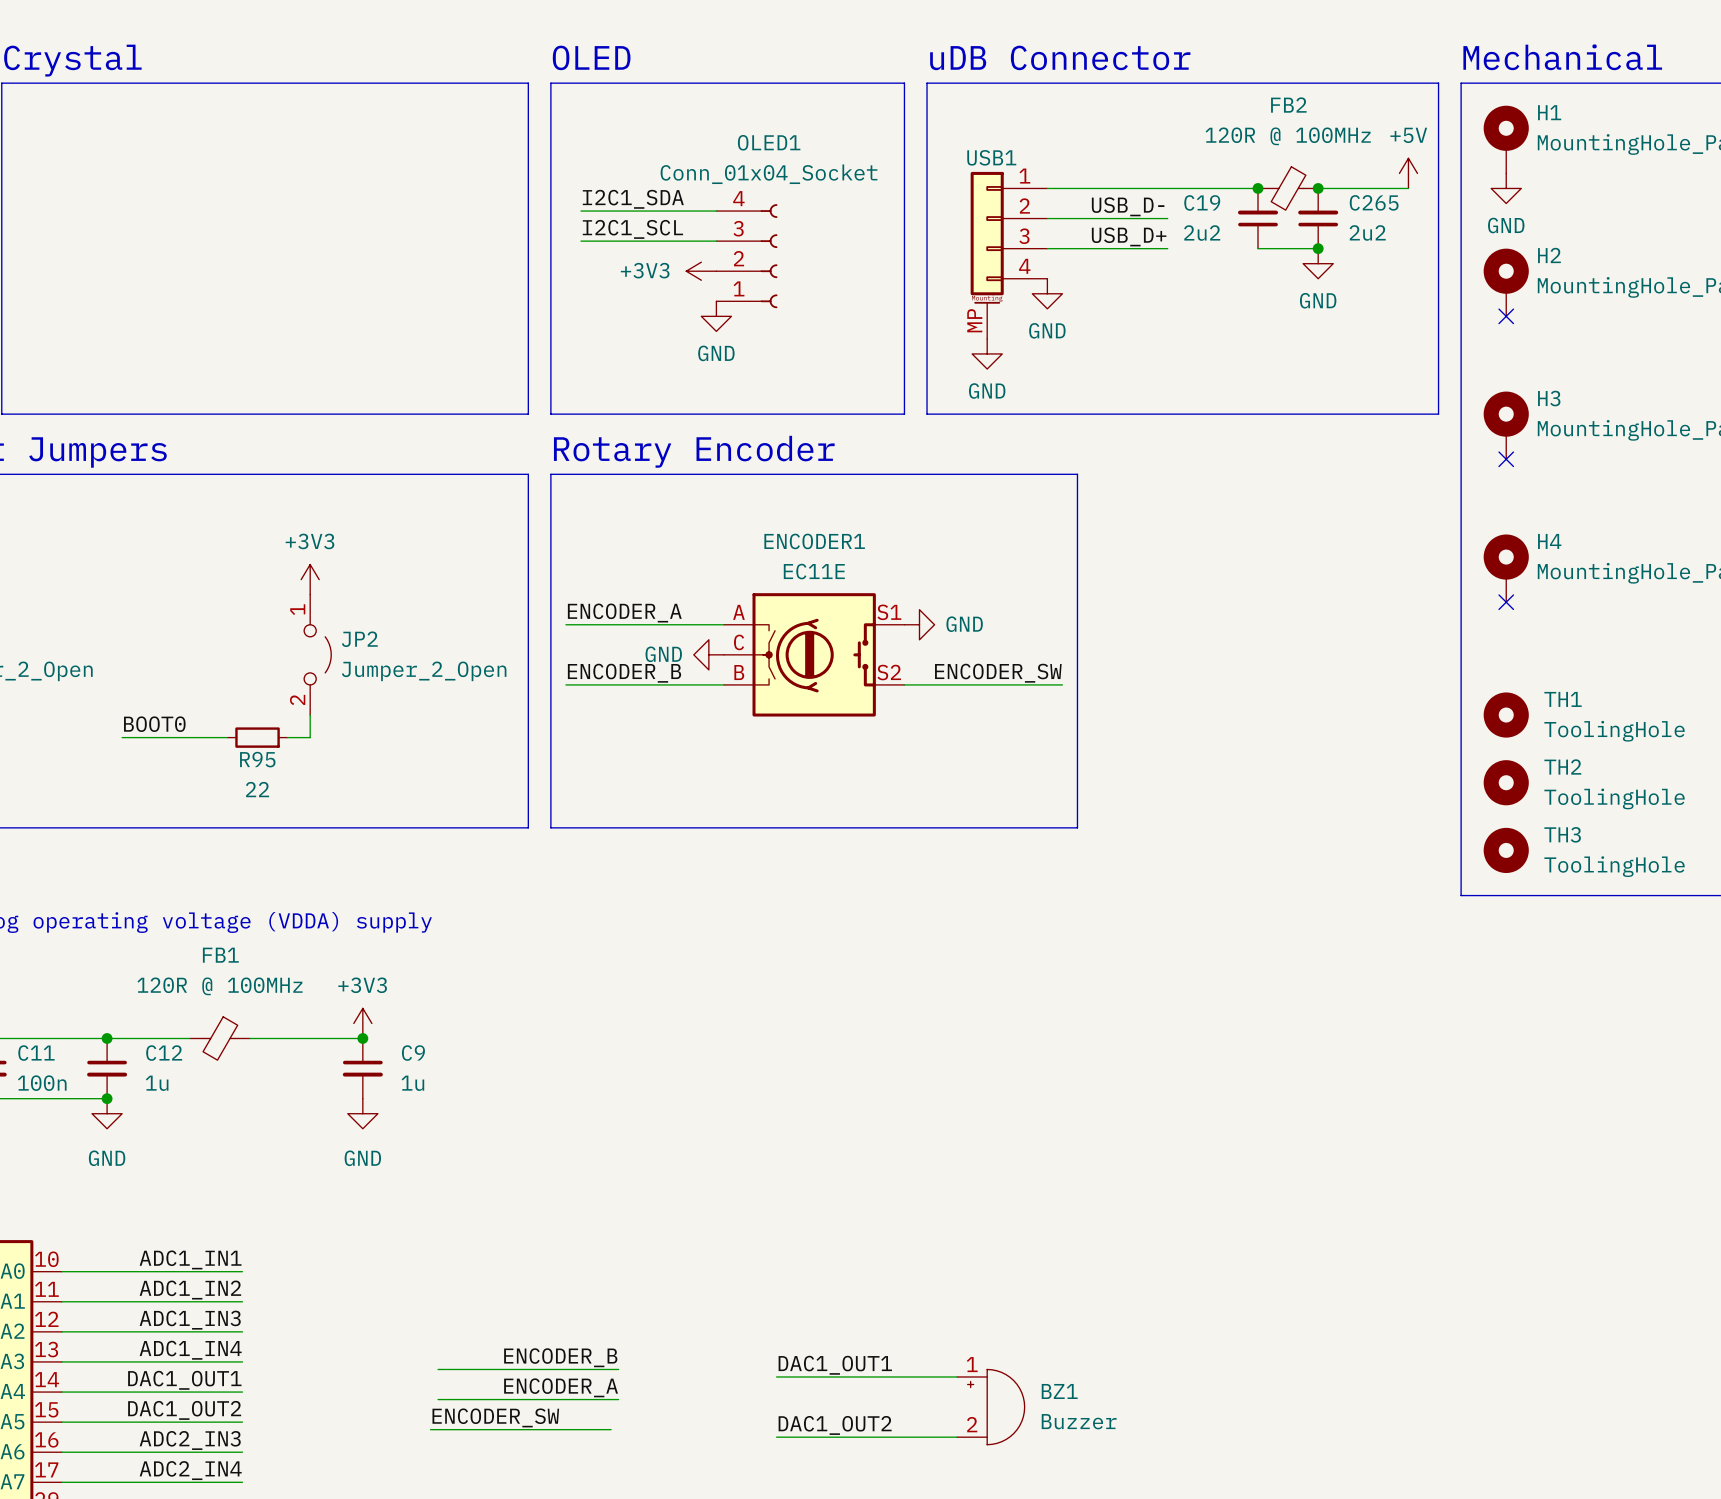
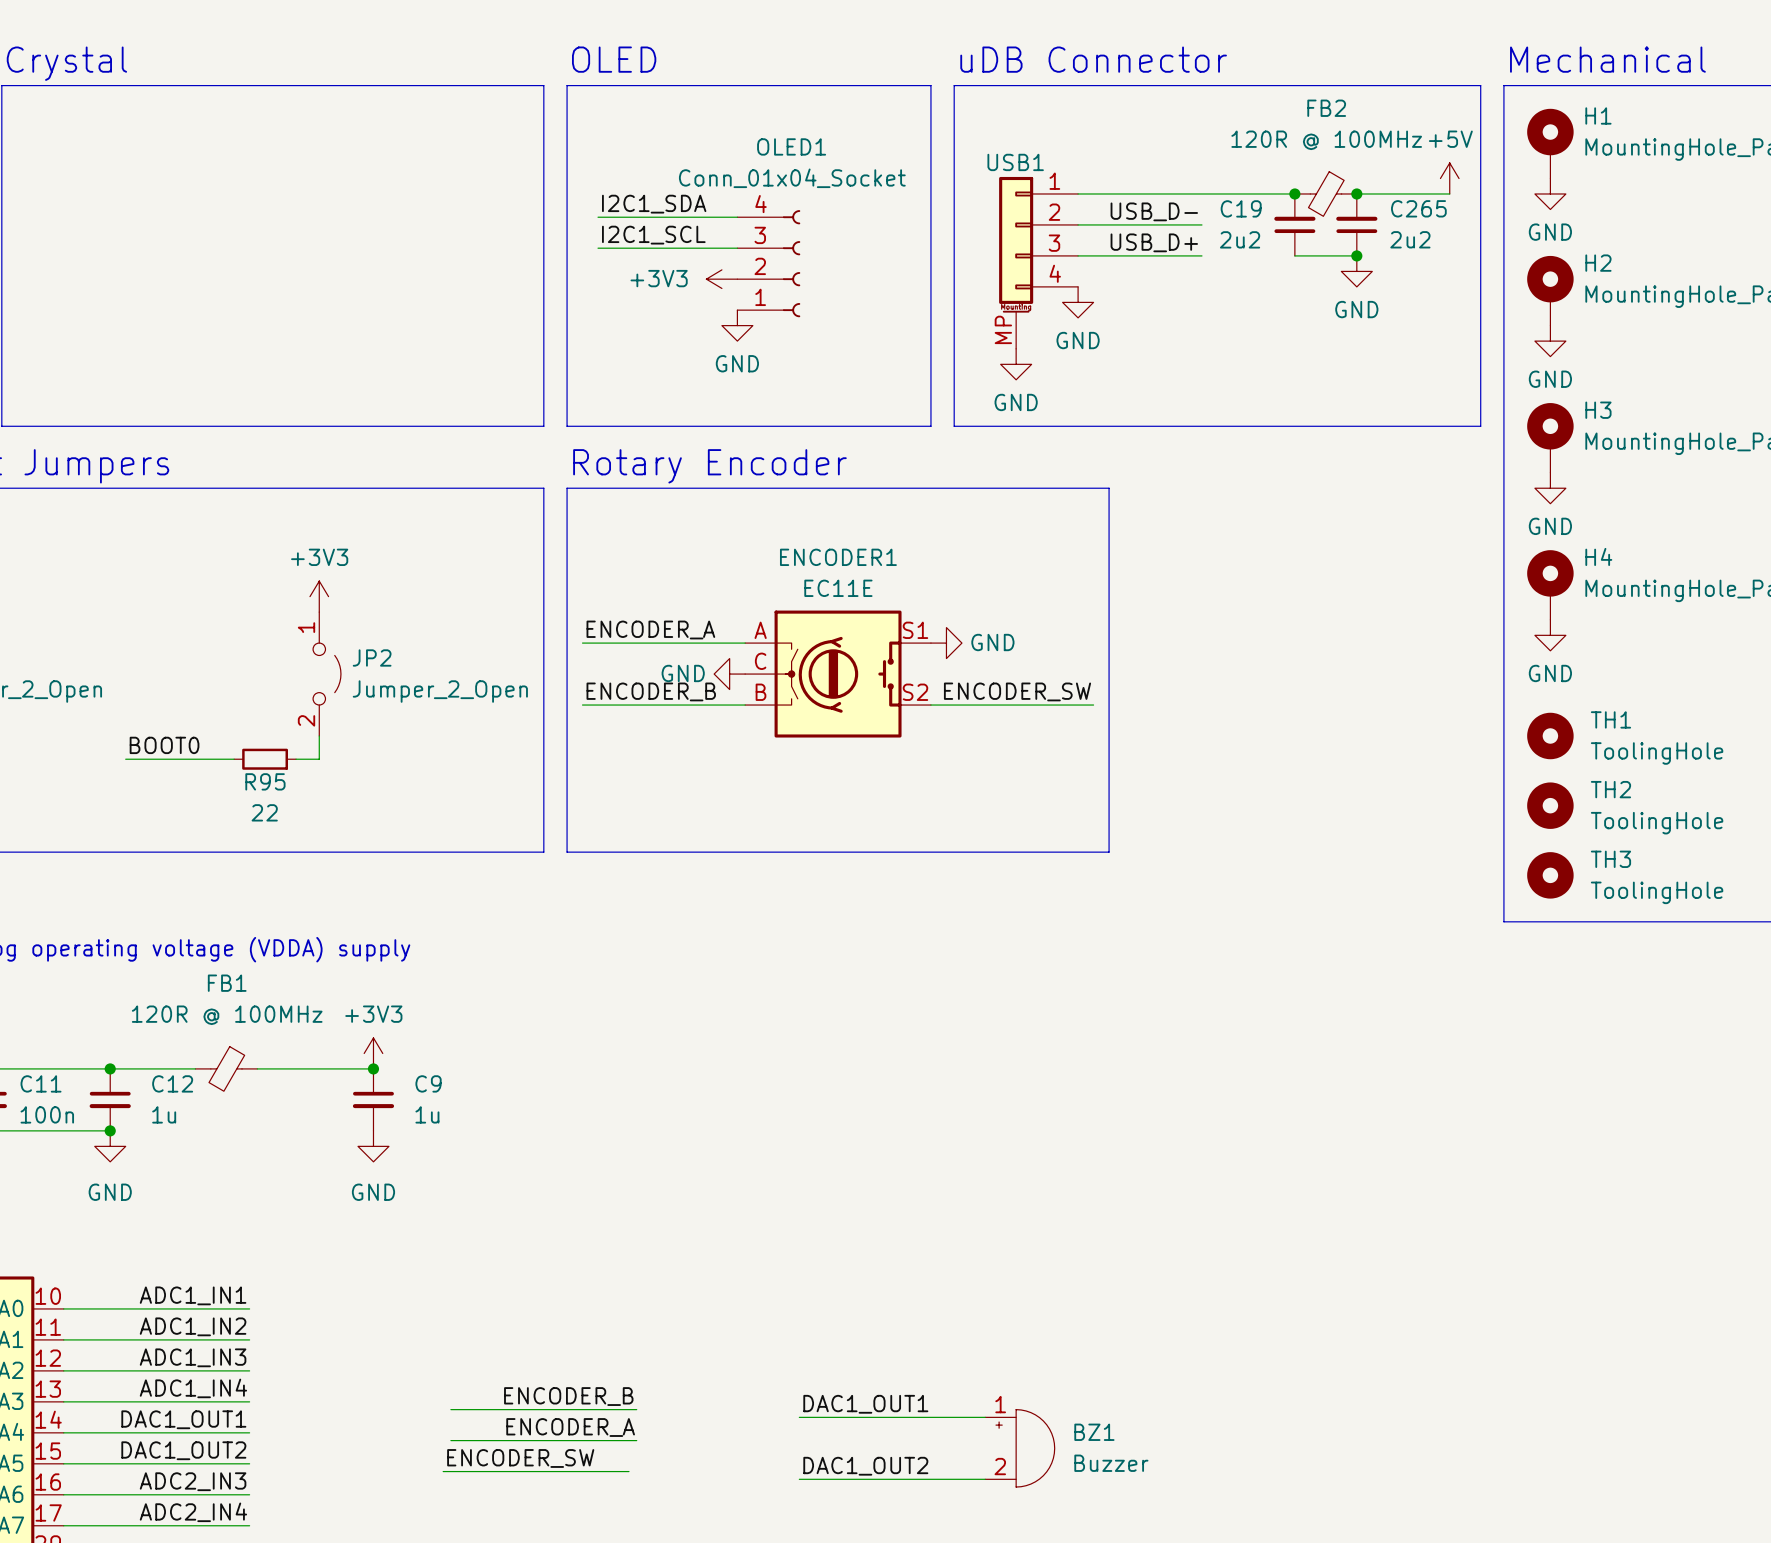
no-connect mark: (1506, 316) -> none
power symbol: none -> GND (1550, 341)
no-connect mark: (1506, 459) -> none
power symbol: none -> GND (1550, 488)
no-connect mark: (1506, 602) -> none
power symbol: none -> GND (1550, 635)

